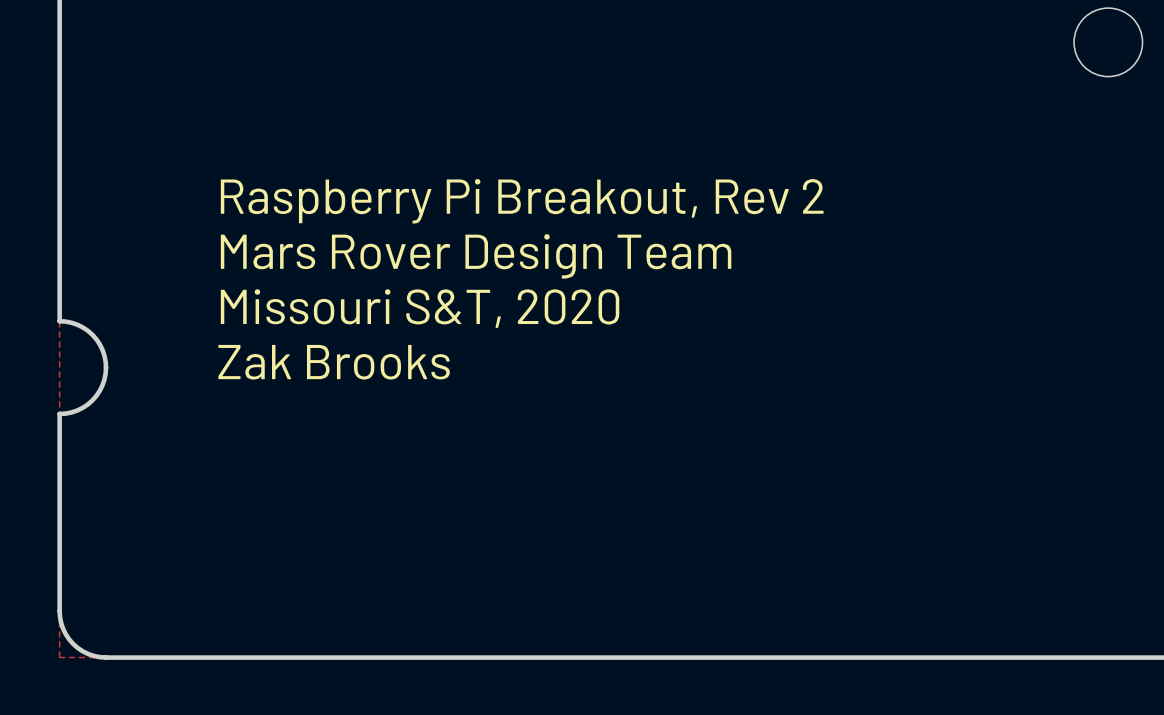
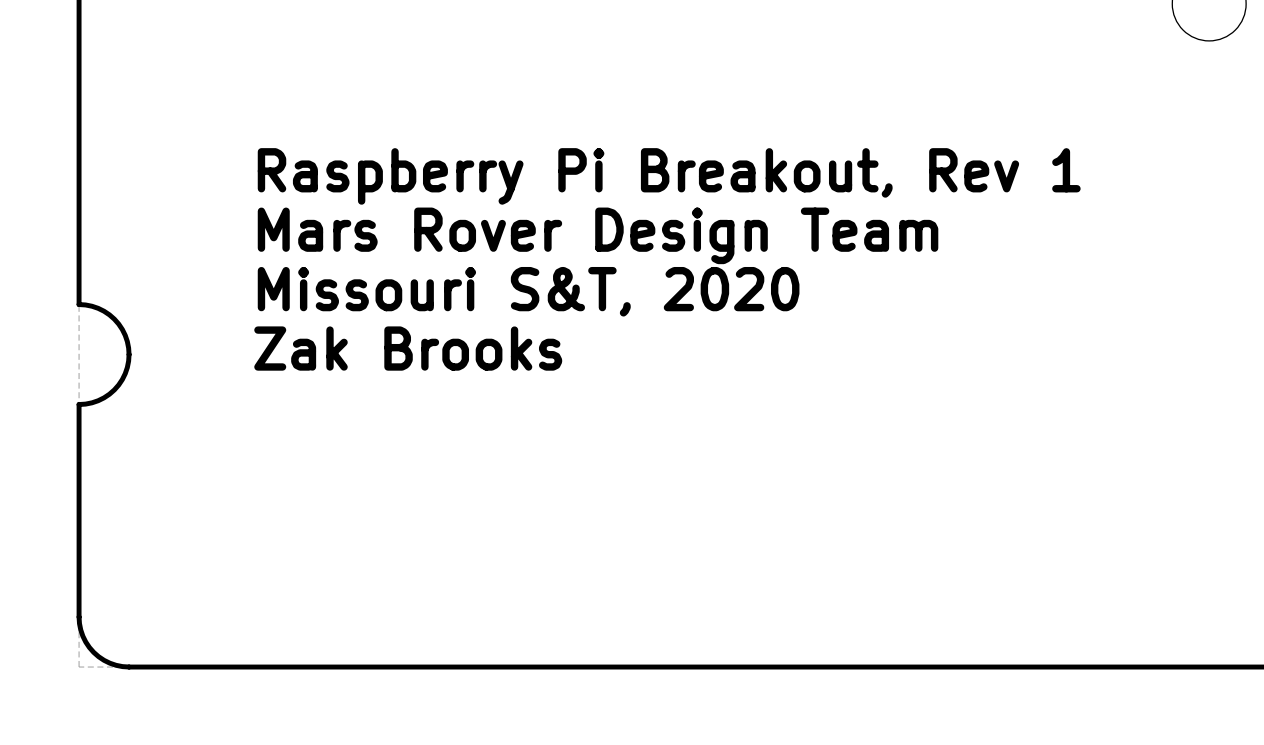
text: Raspberry Pi Breakout, Rev 2 (522, 201) -> Raspberry Pi Breakout, Rev 1 (669, 176)

